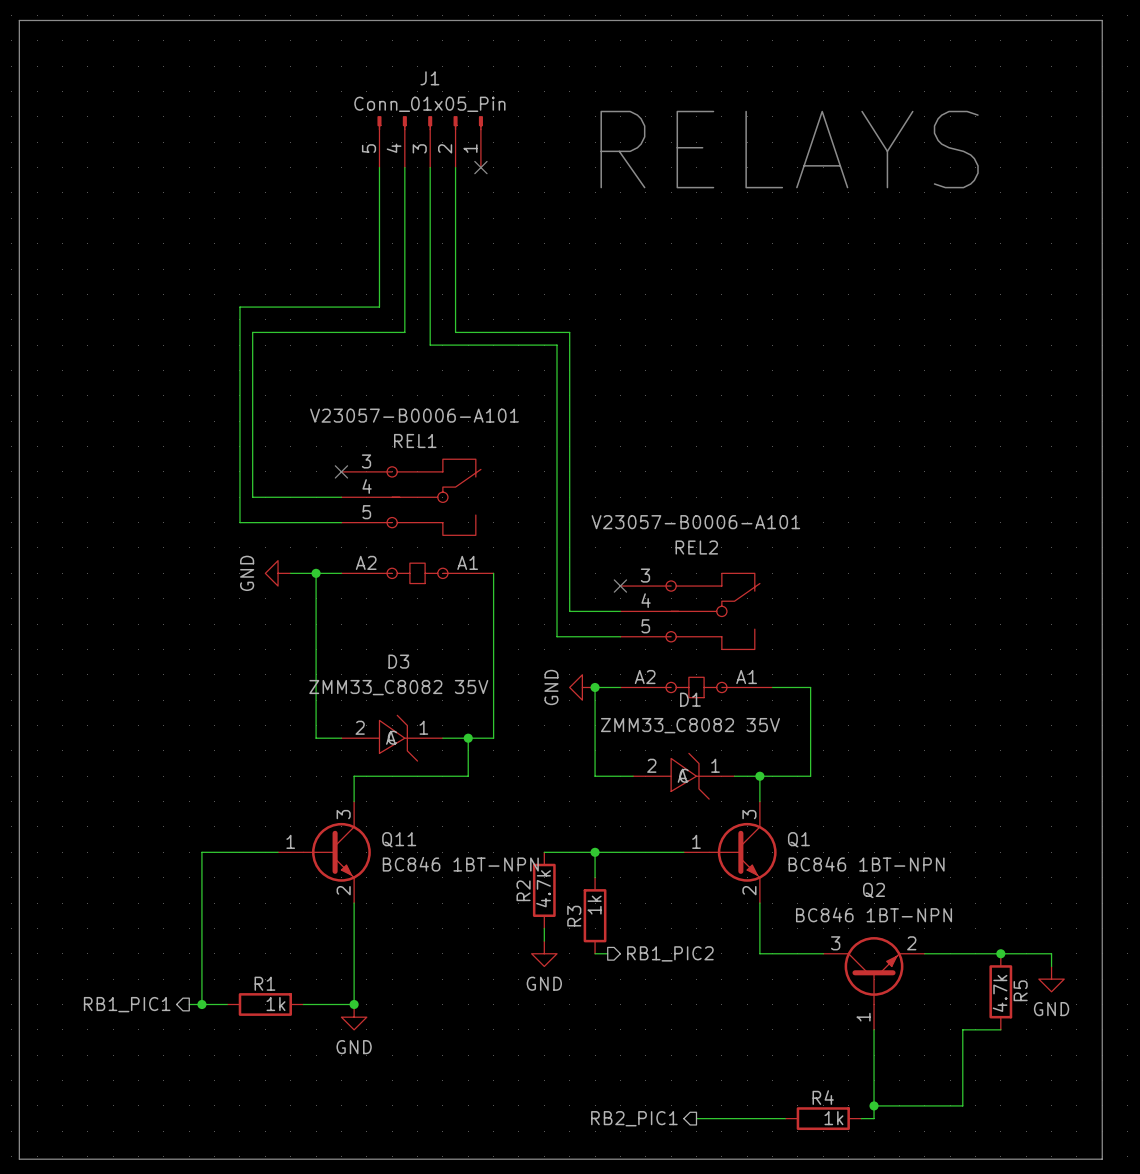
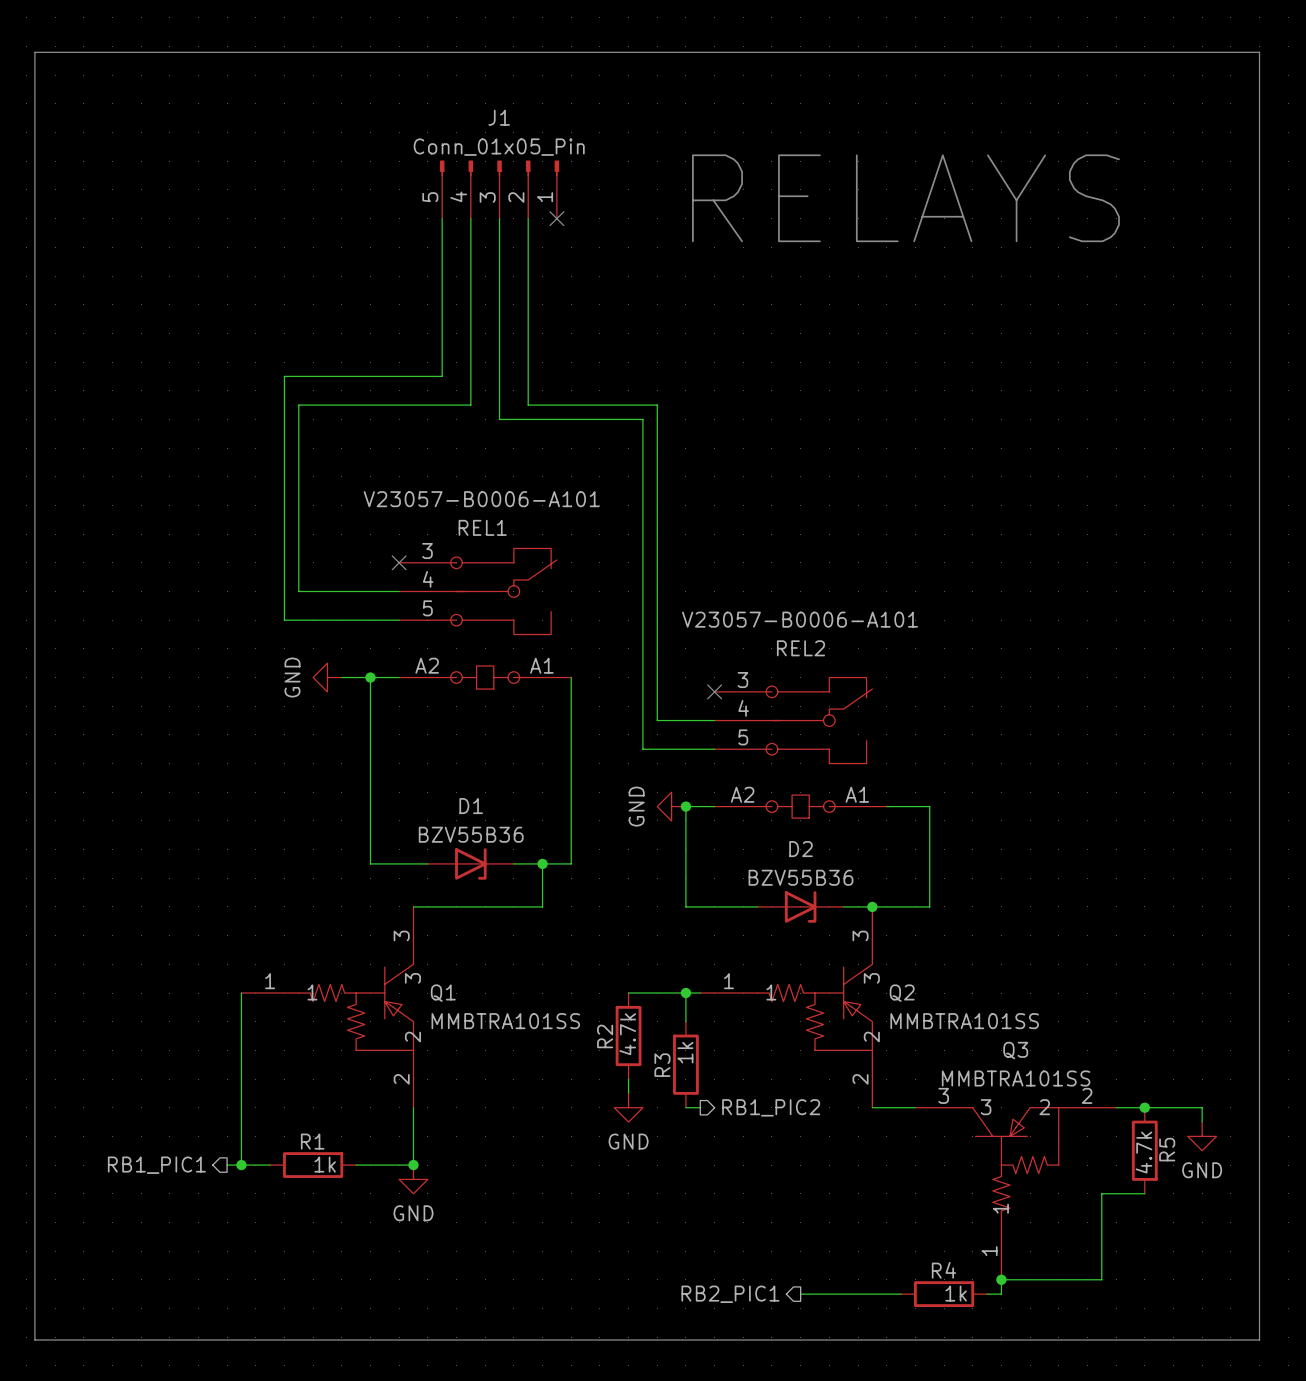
D1 name position: D1 (690, 699) -> D1 (471, 806)
D1 value: ZMM33_C8082 35V (690, 725) -> BZV55B36 (471, 834)
D3: ZMM33_C8082 35V (392, 738) -> none
D1 symbol: [633, 753, 735, 800] -> [427, 848, 514, 880]
D2: none -> BZV55B36 (800, 906)
Q1 symbol: [683, 801, 777, 904] -> [241, 906, 414, 1108]
Q1 name position: Q1 (798, 839) -> Q1 (443, 993)
Q11: BC846 1BT-NPN (324, 852) -> none
Q1 value: BC846 1BT-NPN (866, 864) -> MMBTRA101SS (505, 1021)
Q2 name position: Q2 (874, 890) -> Q2 (902, 993)
Q2 value: BC846 1BT-NPN (874, 914) -> MMBTRA101SS (964, 1021)
Q2 symbol: [823, 937, 925, 1030] -> [700, 906, 873, 1108]
Q3: none -> MMBTRA101SS (1015, 1193)

